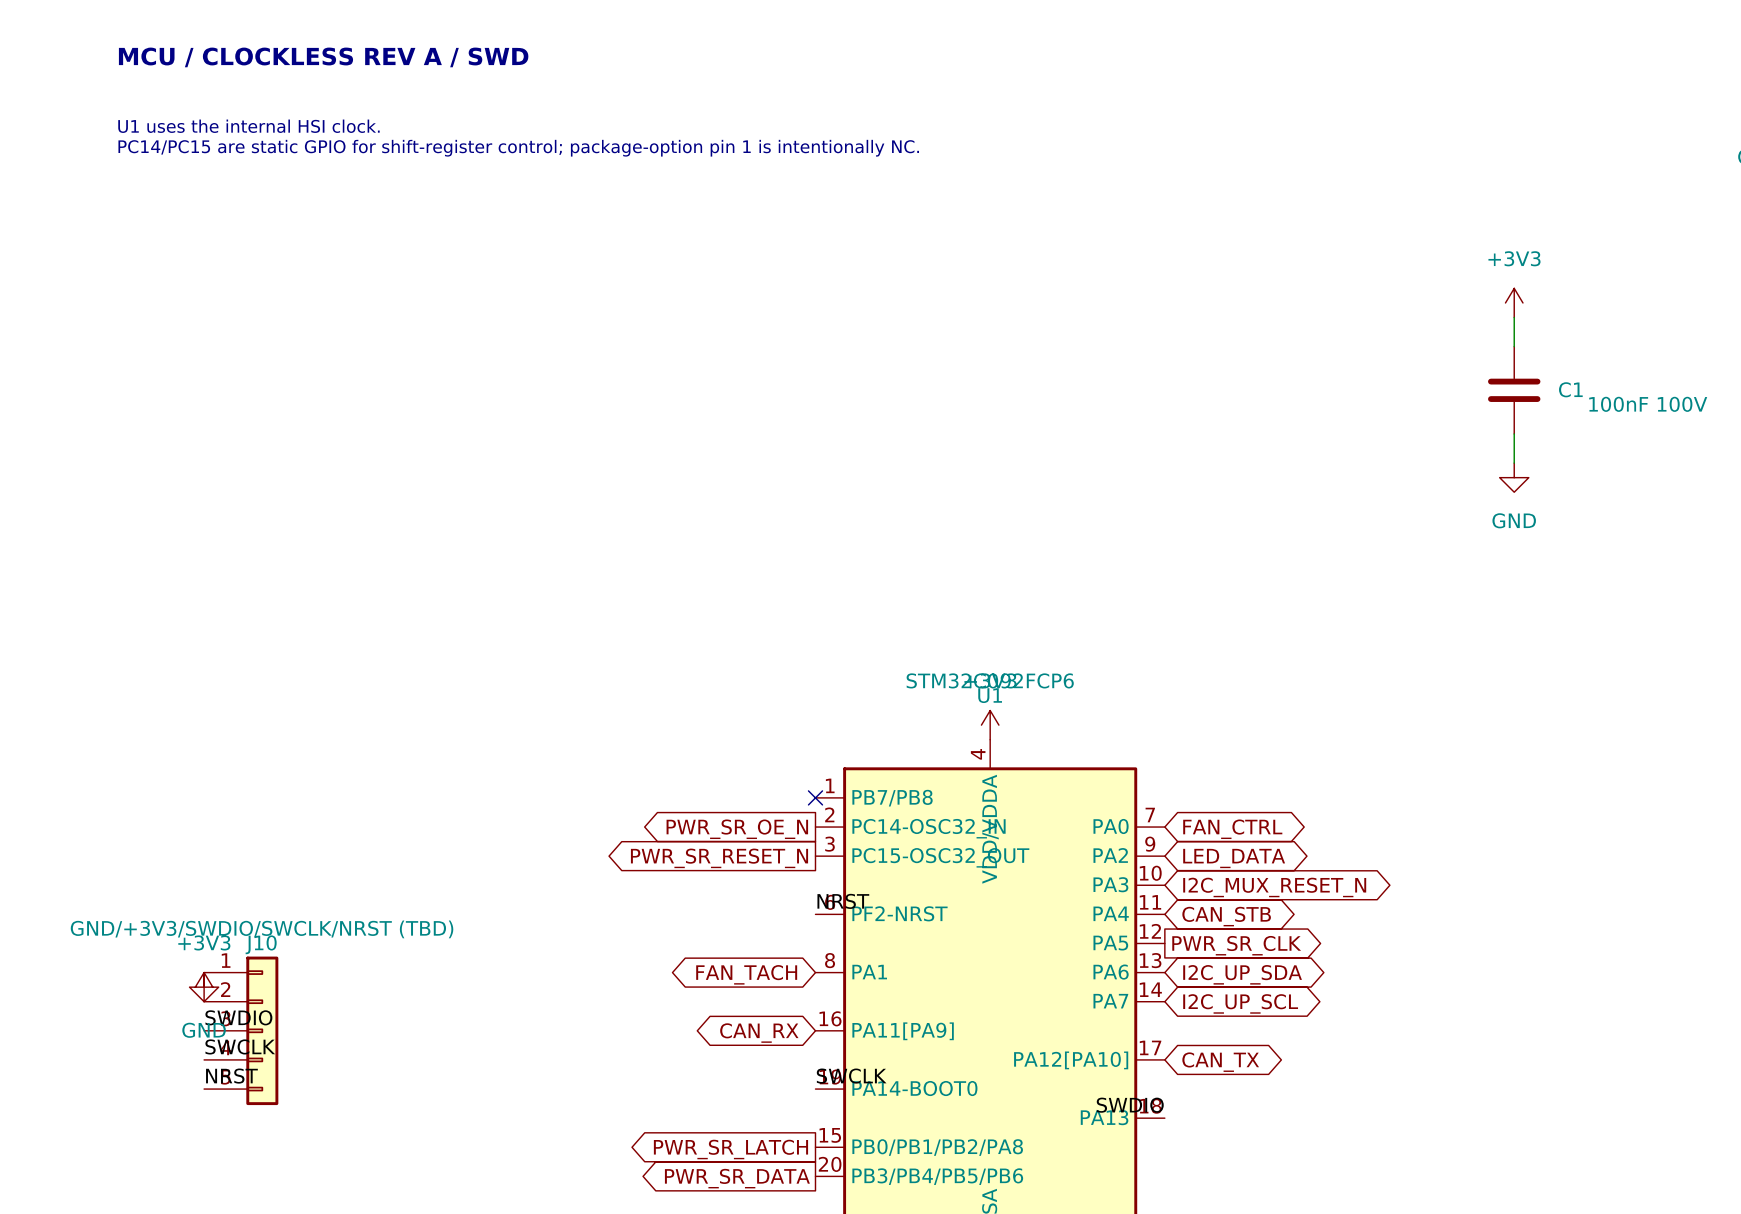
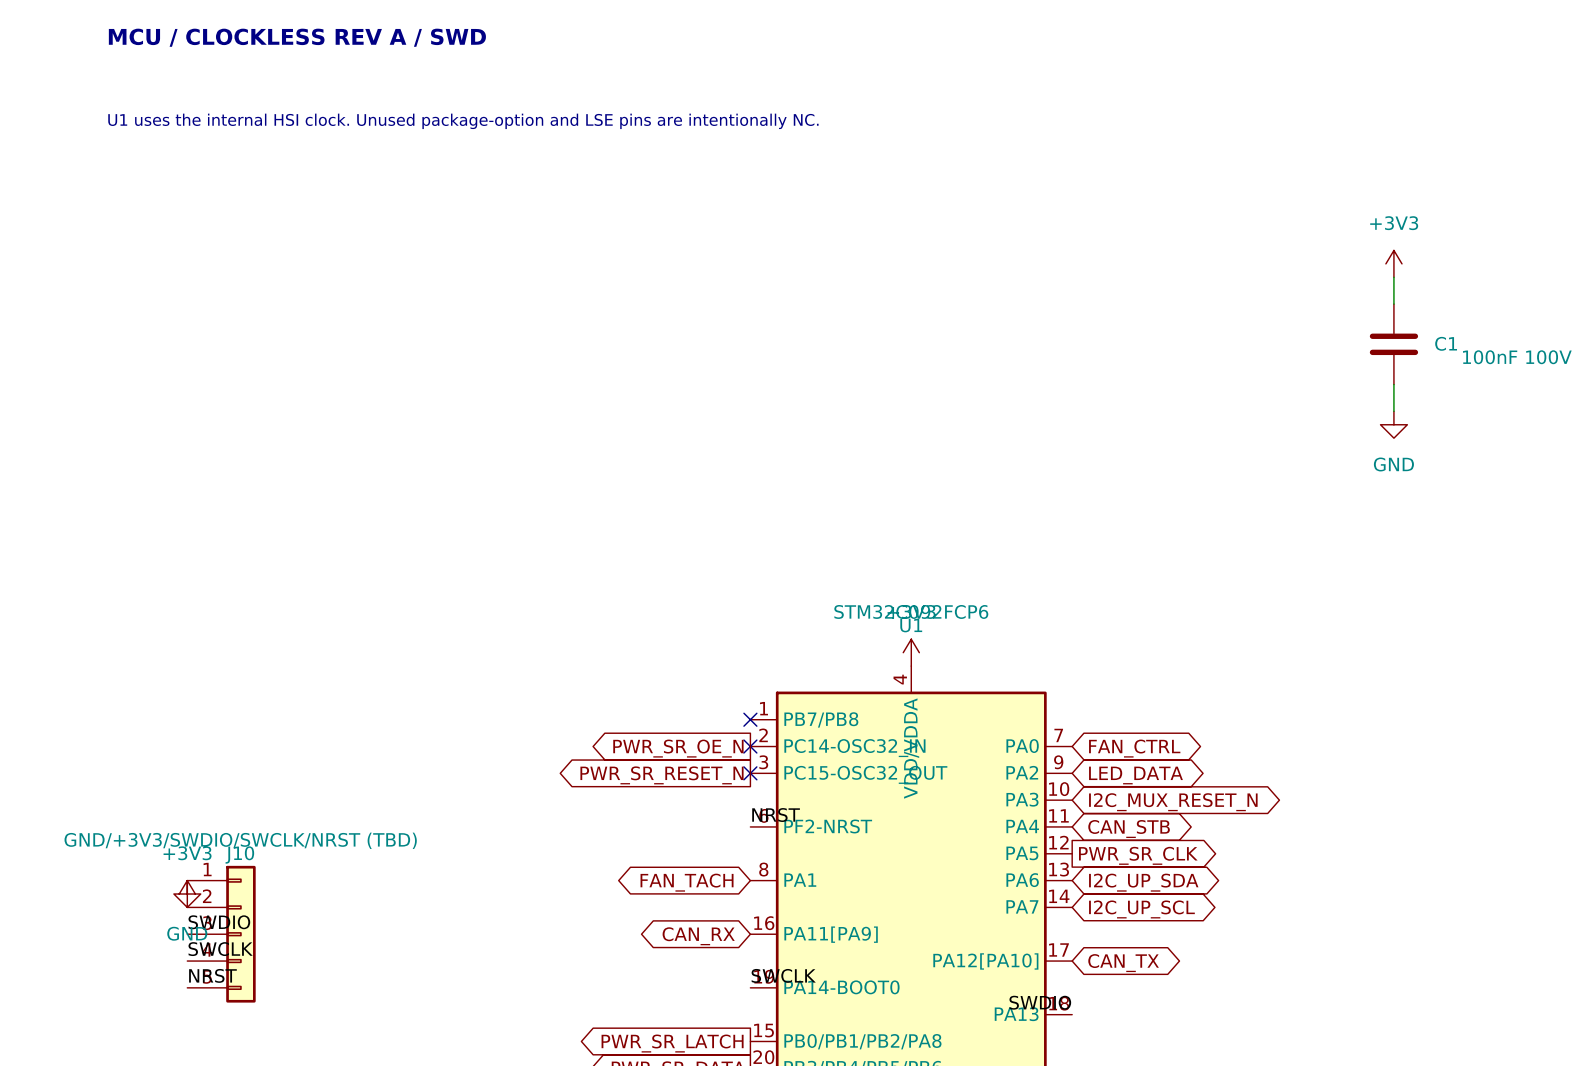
text: U1 uses the internal HSI clock. (248, 126) -> none
text: PC14/PC15 are static GPIO for shift-register control; package-option pin 1 is intentionally NC. (518, 148) -> U1 uses the internal HSI clock. Unused package-option and LSE pins are intentionally NC. (463, 121)
no-connect mark: none -> (750, 746)
no-connect mark: none -> (750, 773)

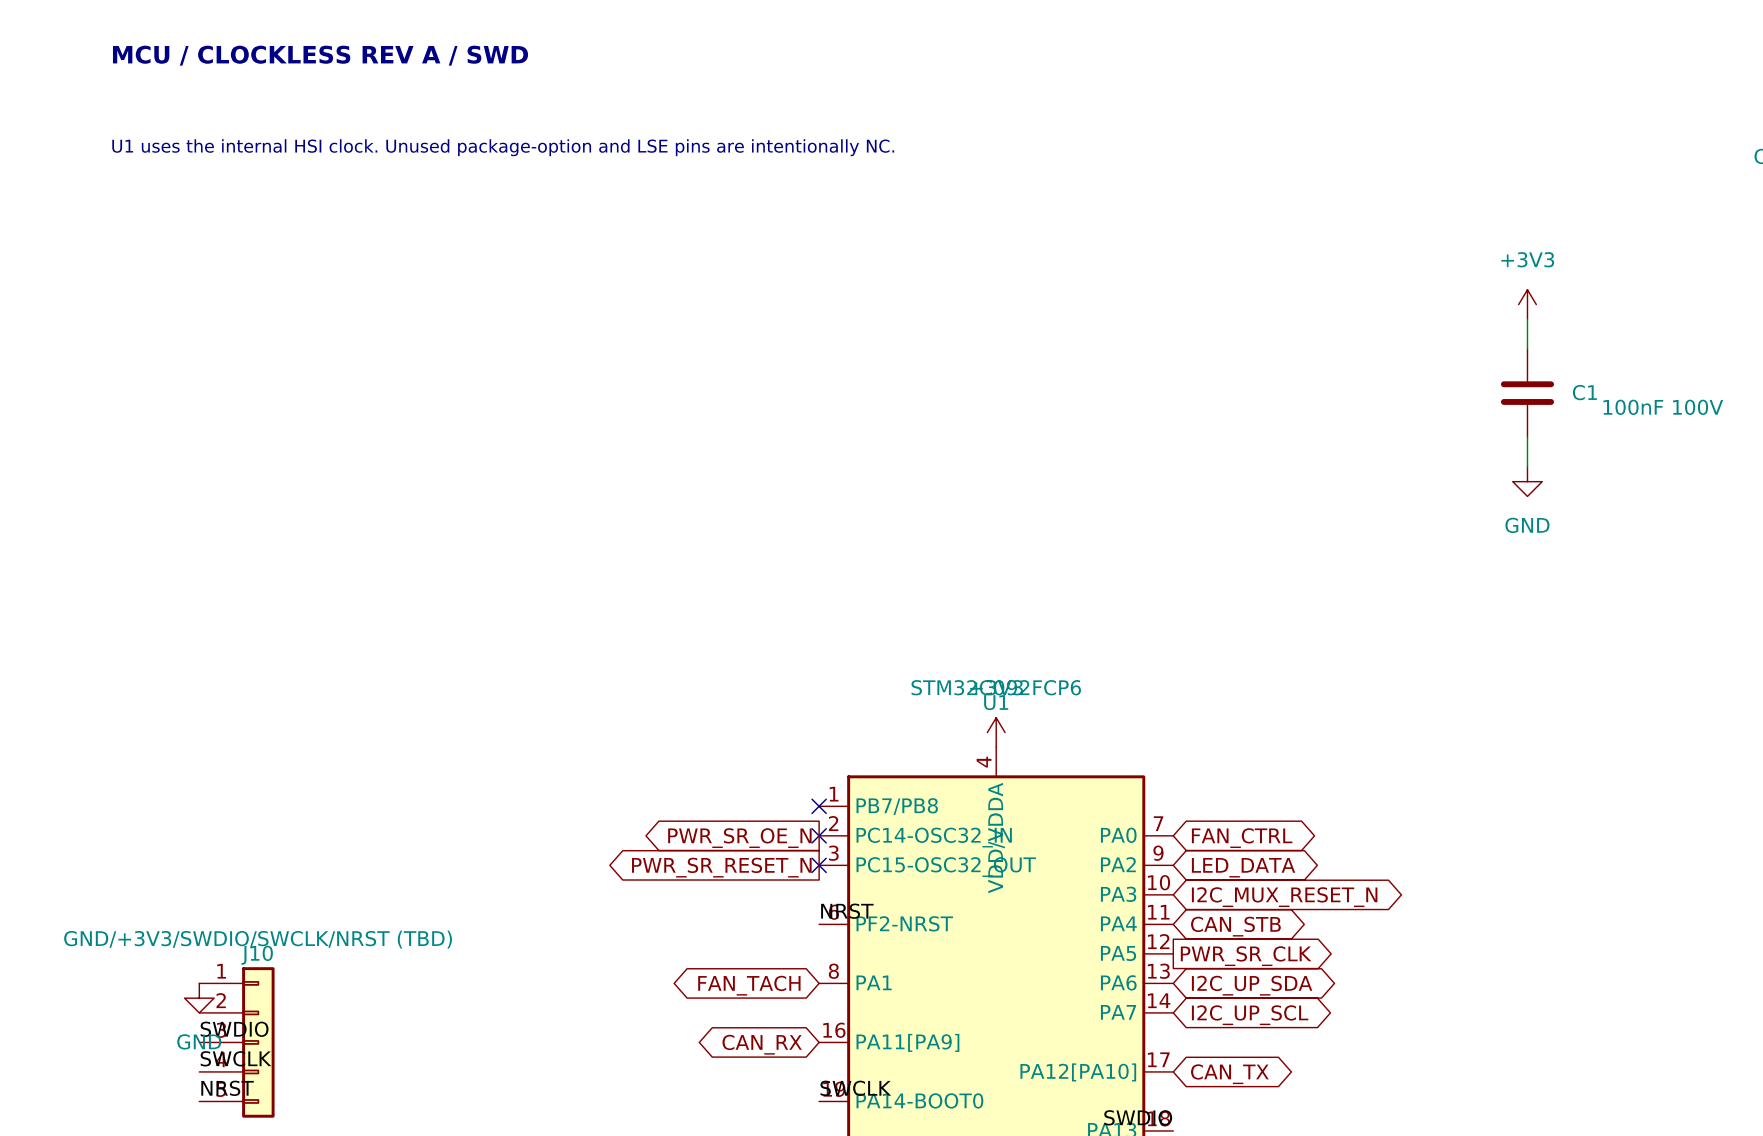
power symbol: +3V3 (187, 894) -> none

